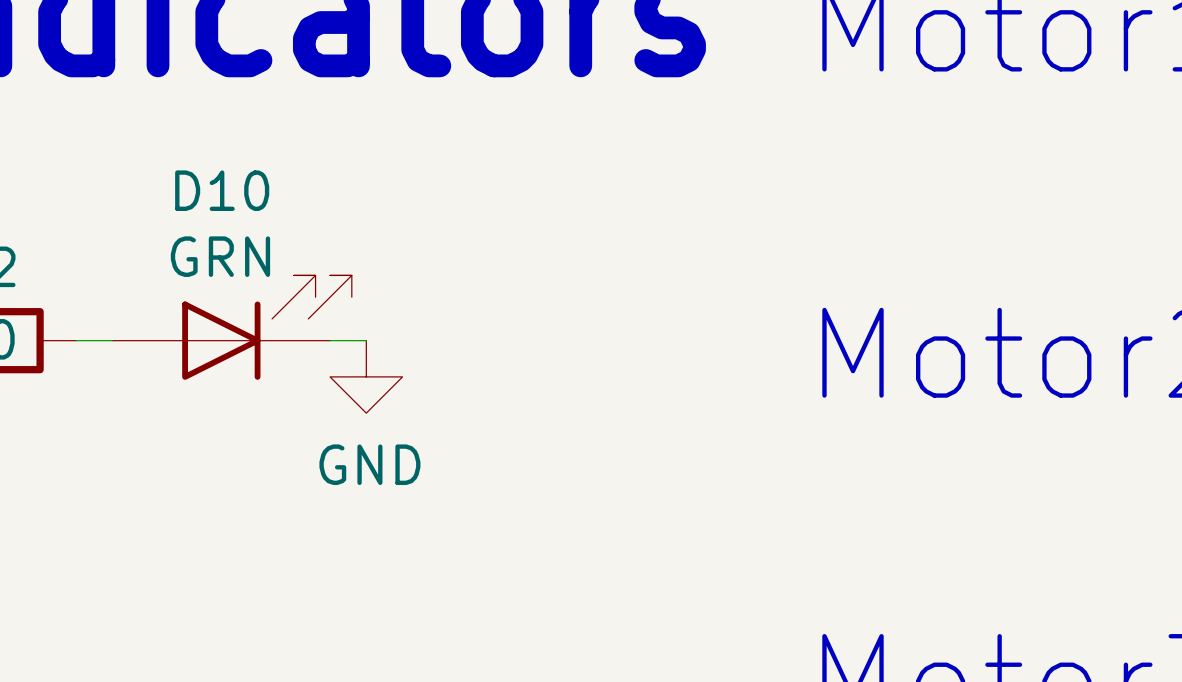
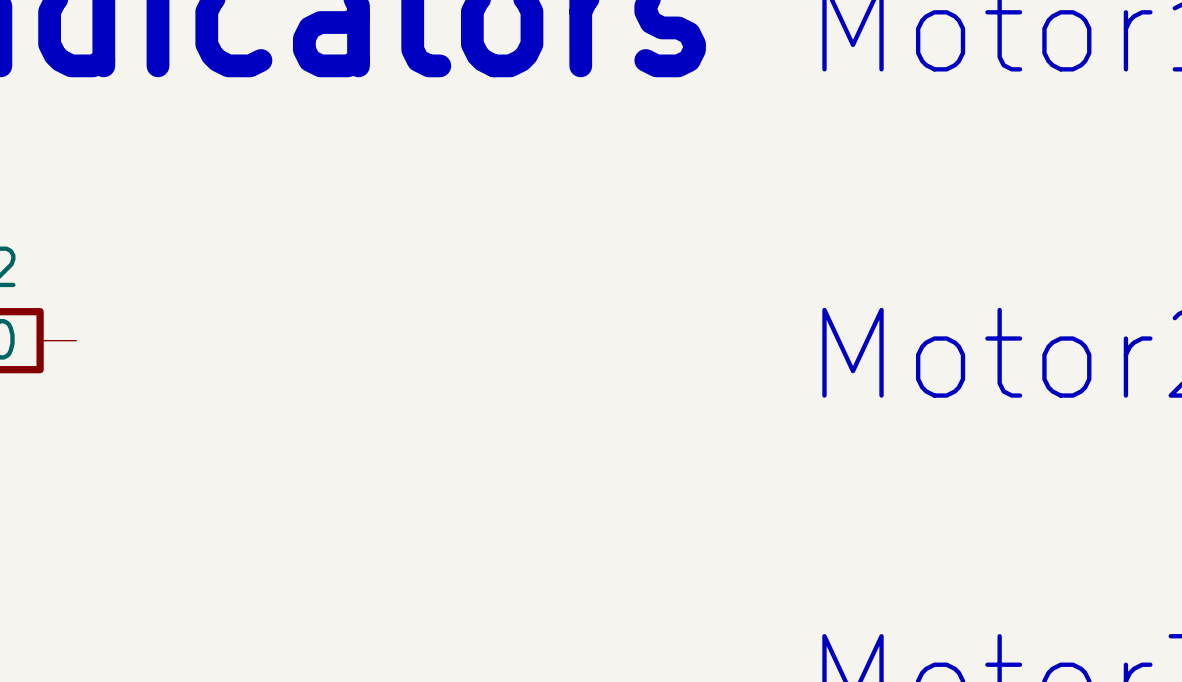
D10: GRN (232, 327) -> none
wire: (76, 340) (112, 340) -> none
wire: (330, 340) (366, 340) -> none
power symbol: GND (366, 376) -> none

